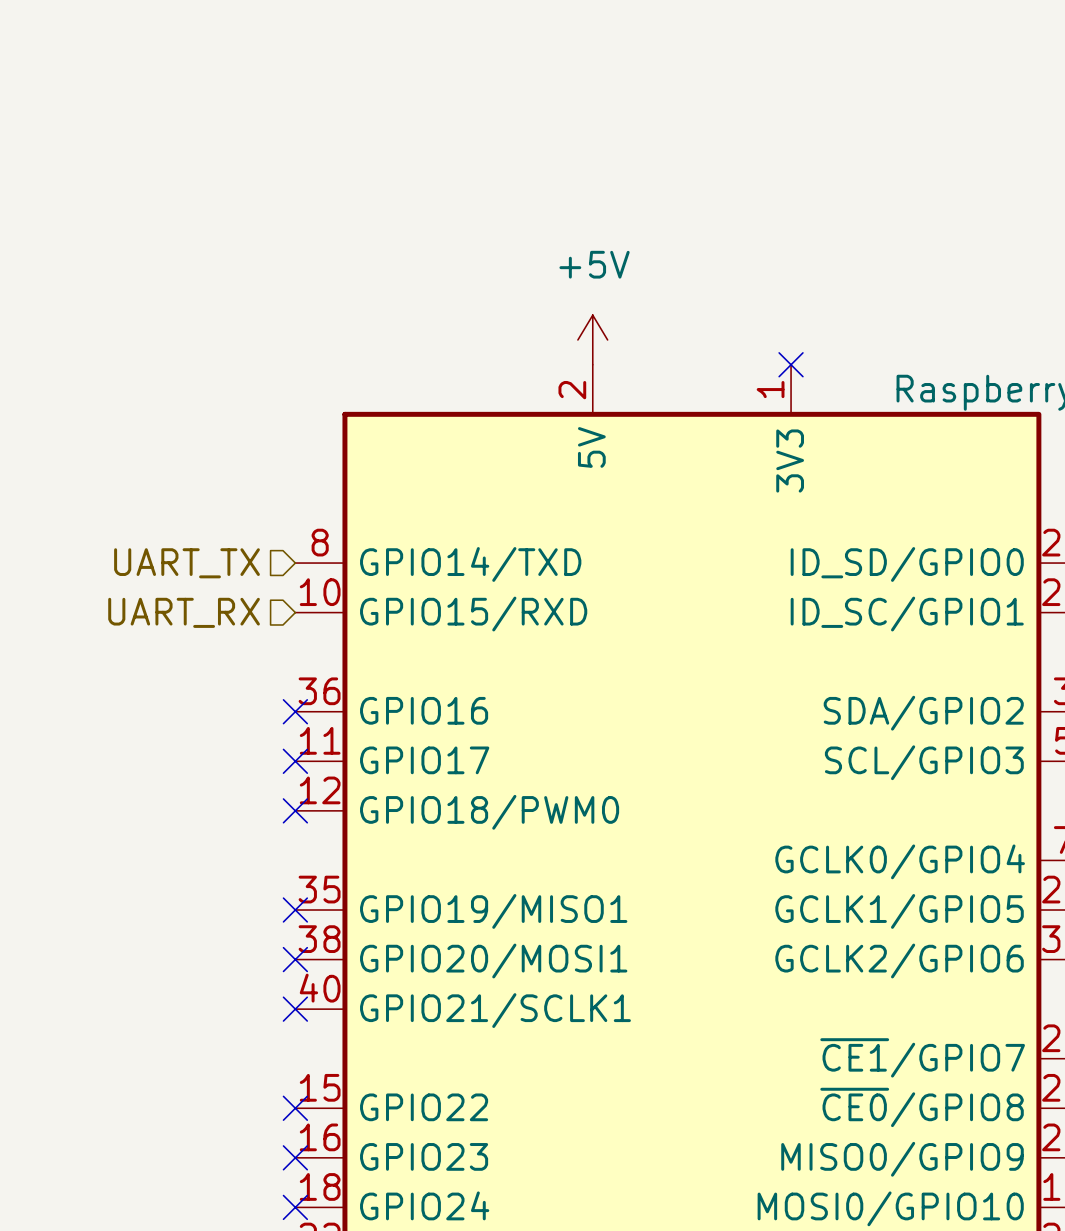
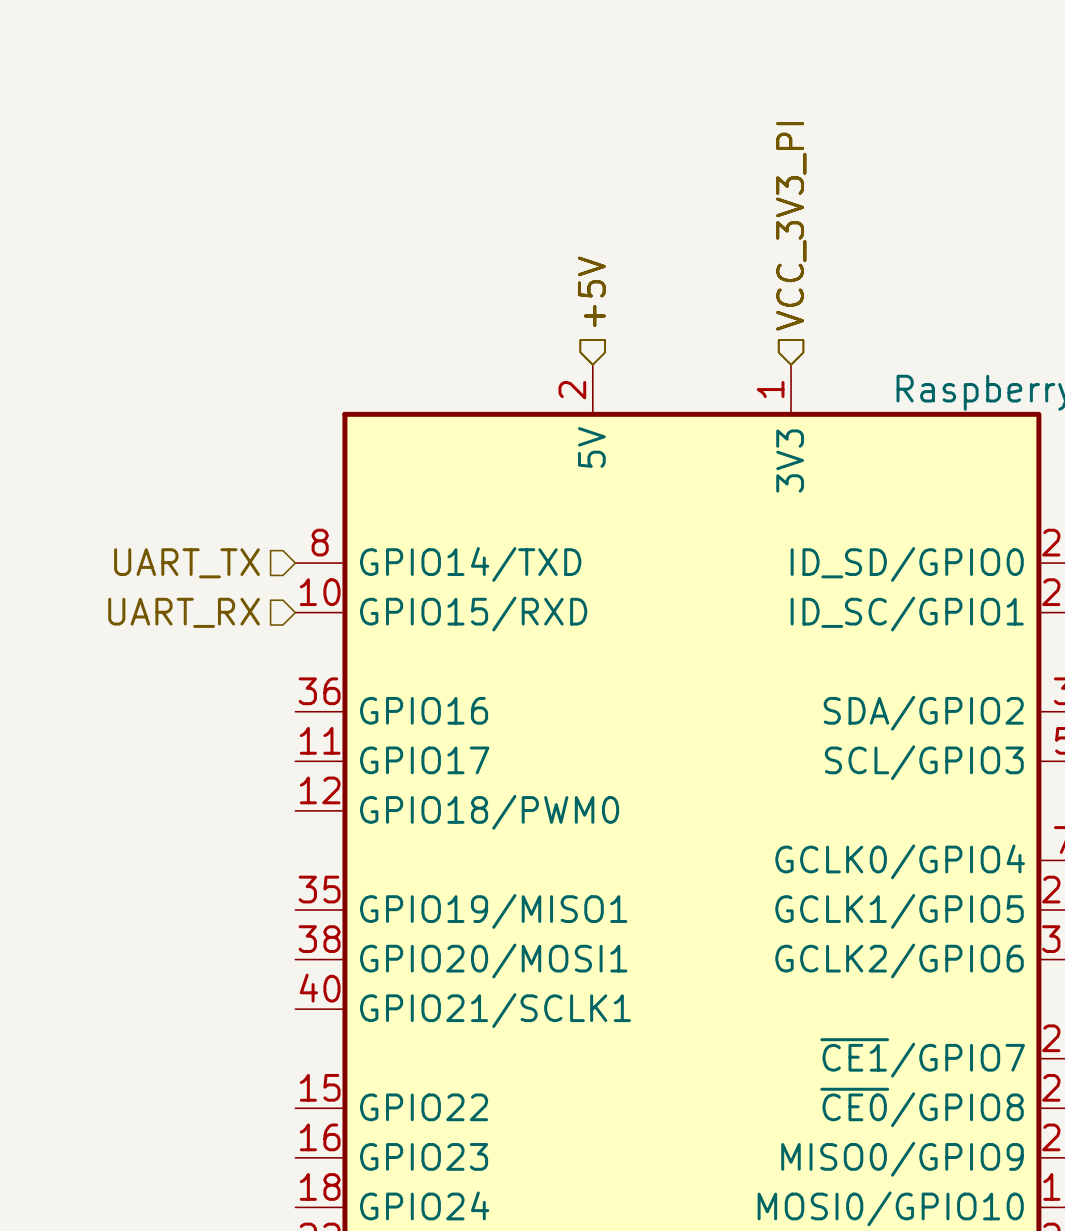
hierarchical label: none -> VCC_3V3_PI (791, 226)
hierarchical label: none -> +5V (591, 291)
power symbol: +5V (592, 339) -> none
no-connect mark: (791, 364) -> none
no-connect mark: (295, 711) -> none
no-connect mark: (295, 761) -> none
no-connect mark: (295, 810) -> none
no-connect mark: (295, 910) -> none
no-connect mark: (295, 959) -> none
no-connect mark: (295, 1009) -> none
no-connect mark: (295, 1108) -> none
no-connect mark: (295, 1157) -> none
no-connect mark: (295, 1207) -> none

